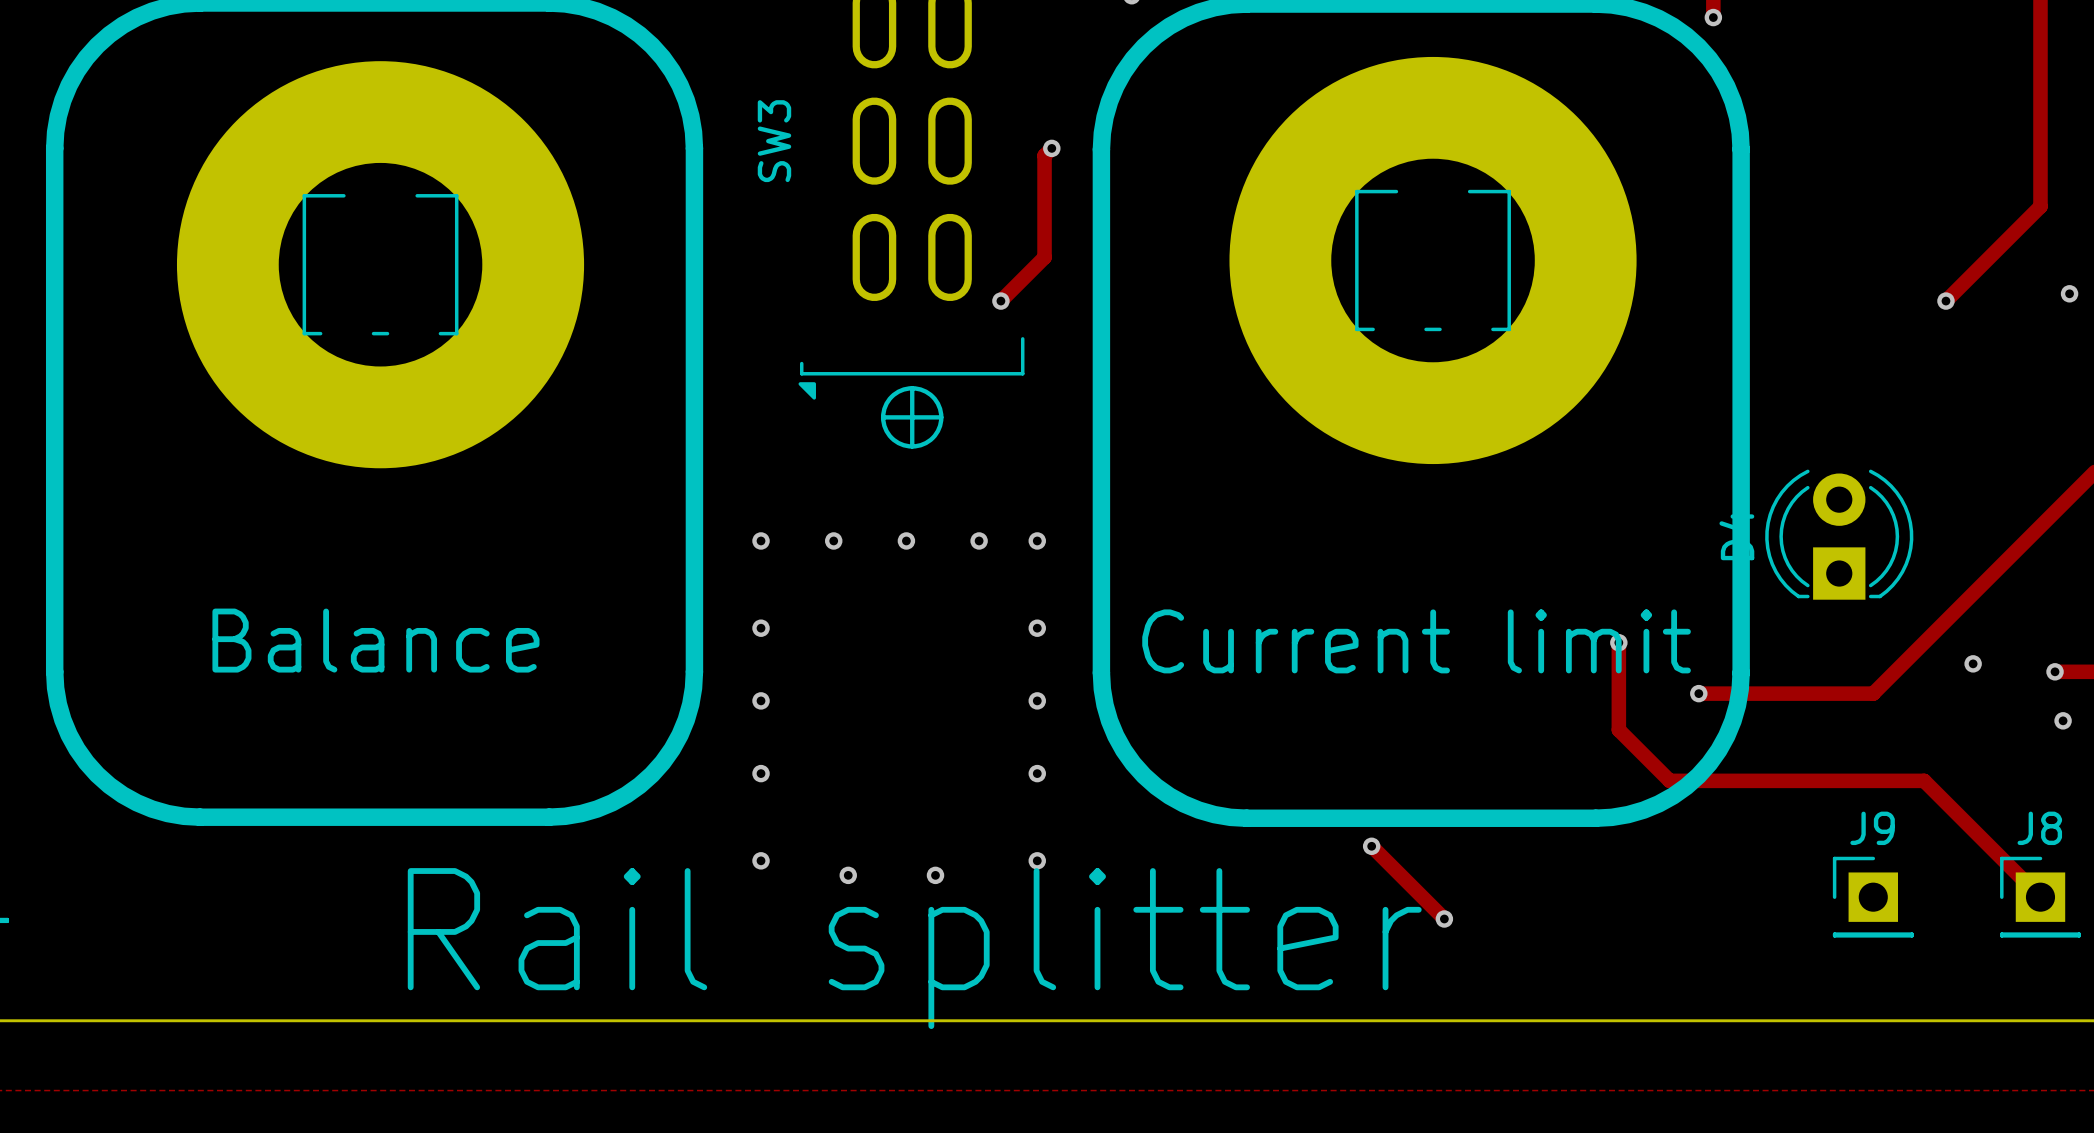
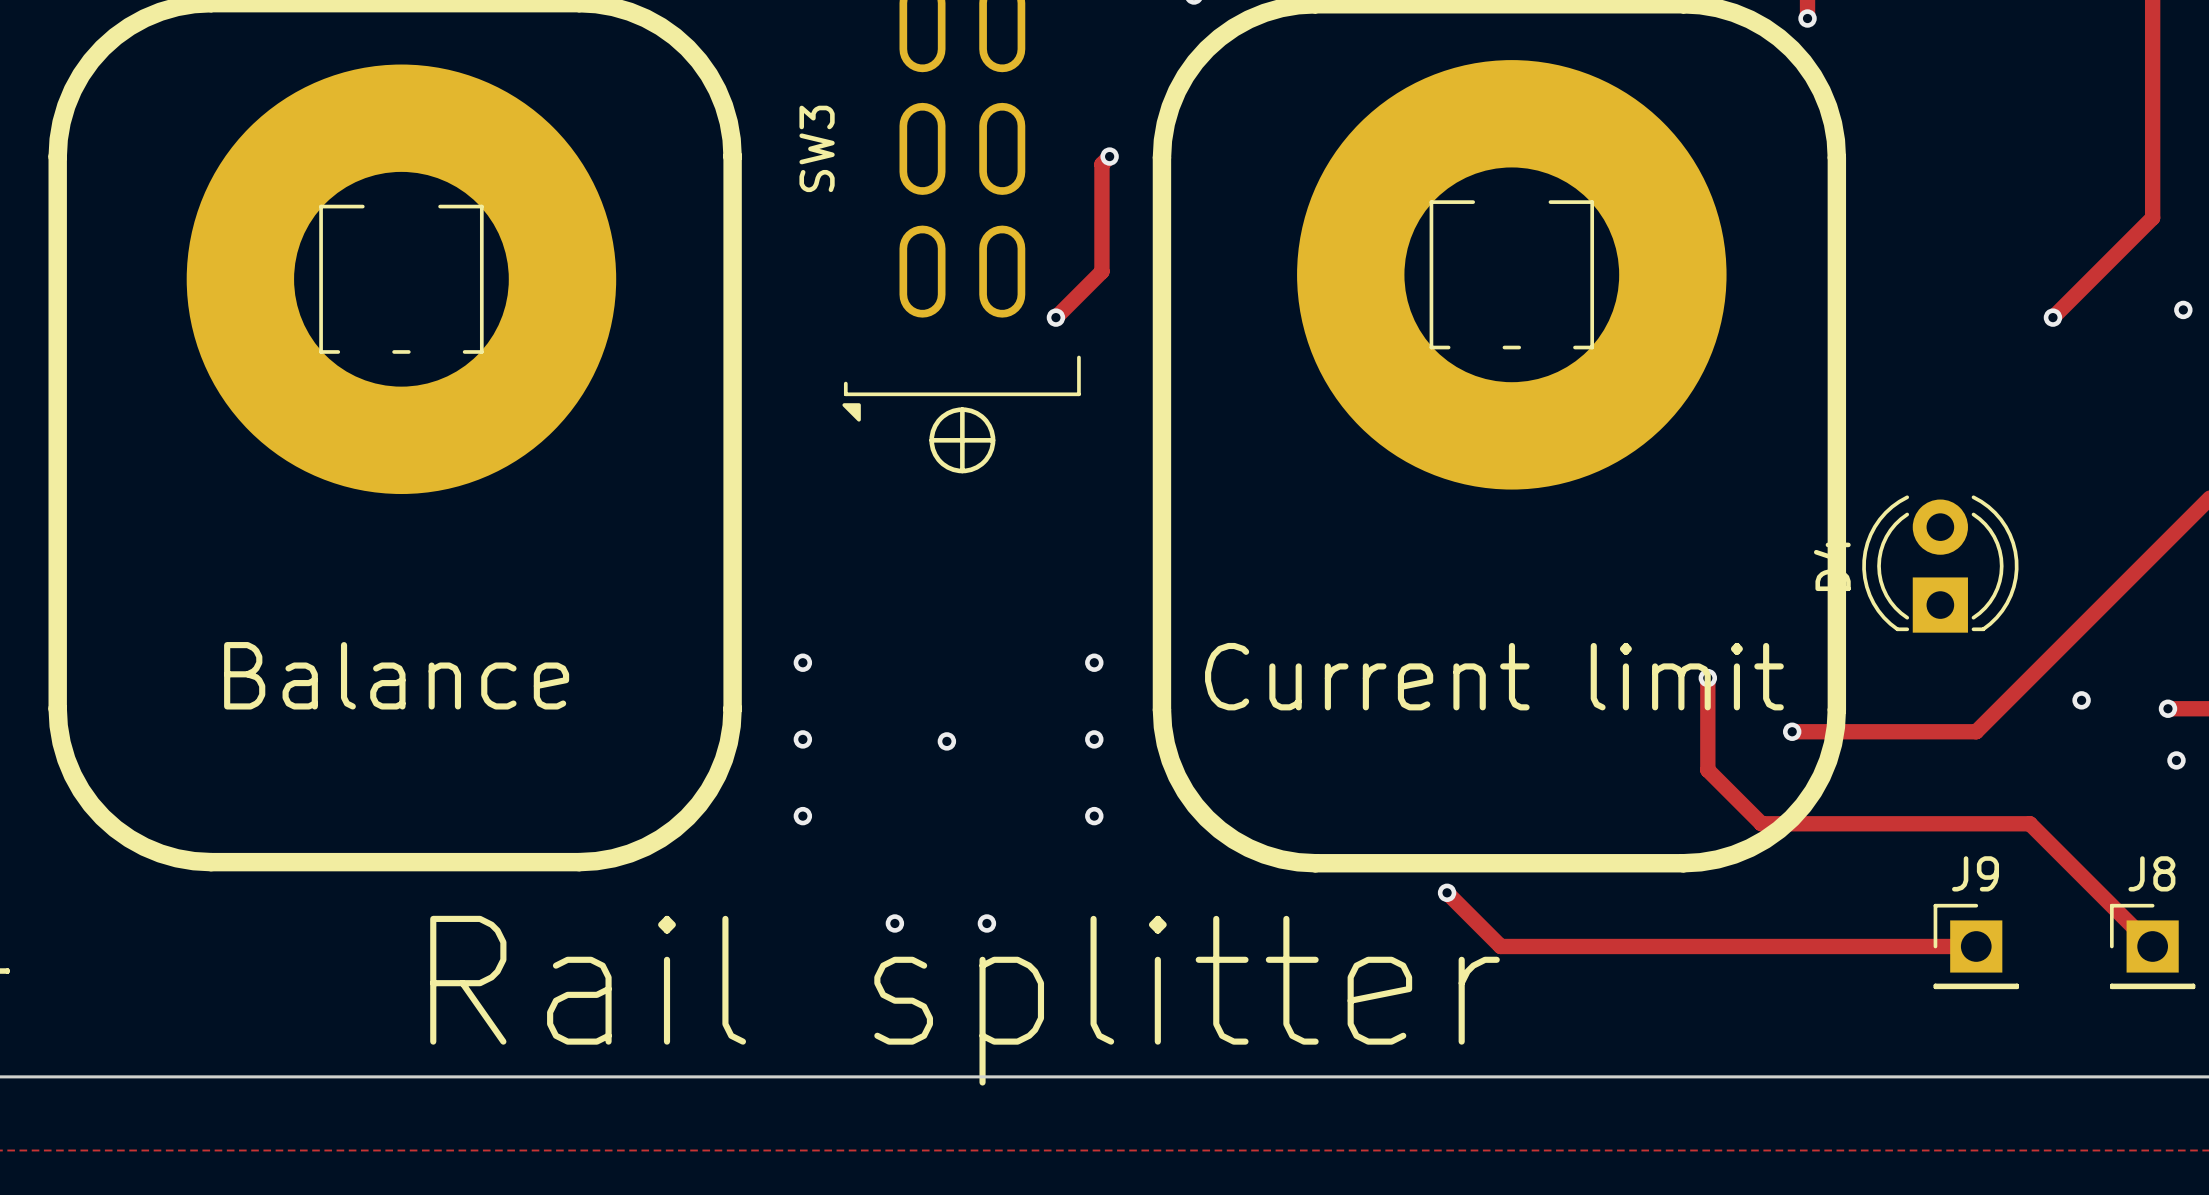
via: (761, 540) -> none
via: (833, 540) -> none
via: (906, 540) -> none
via: (979, 540) -> none
via: (1037, 540) -> none
via: none -> (946, 741)
via: (761, 860) -> none
via: (1037, 860) -> none
track: (1422, 897) (1444, 918) -> (1500, 946) (1976, 946)
via: (1444, 918) -> none

